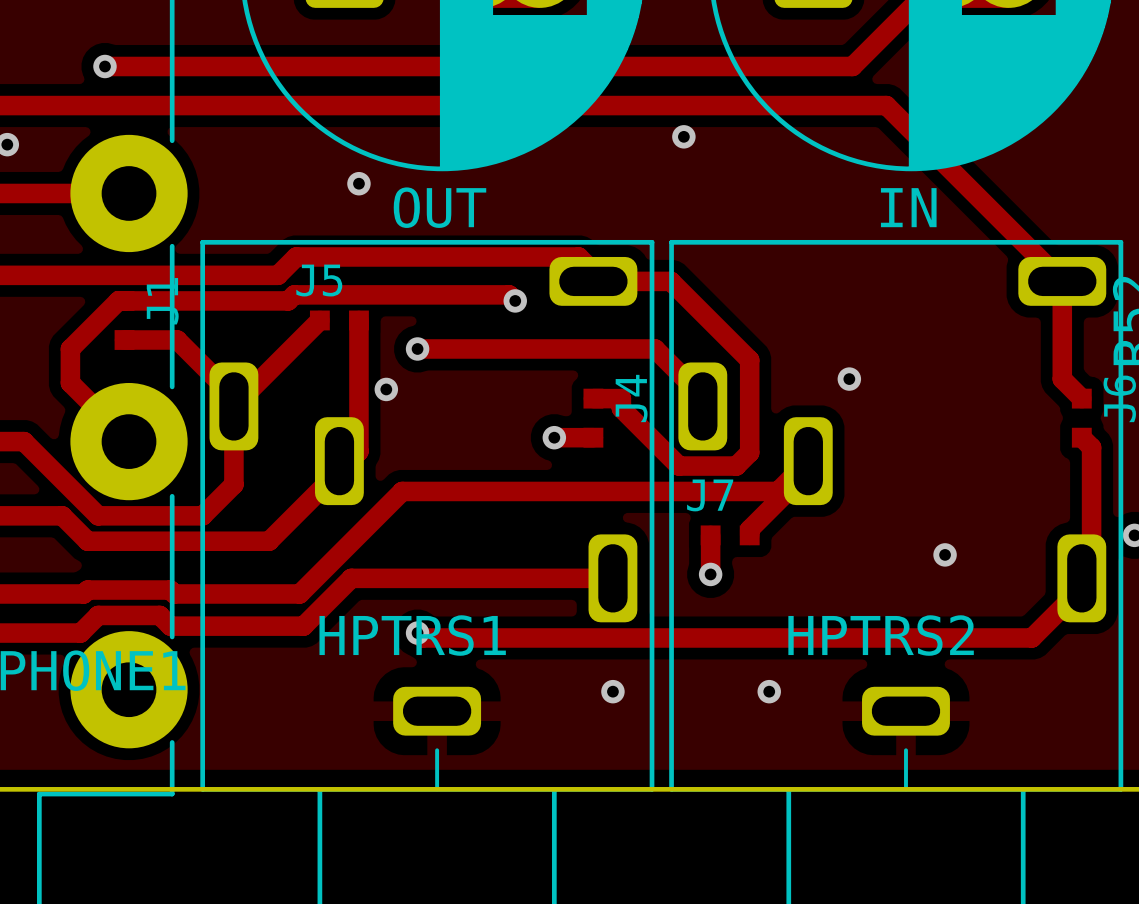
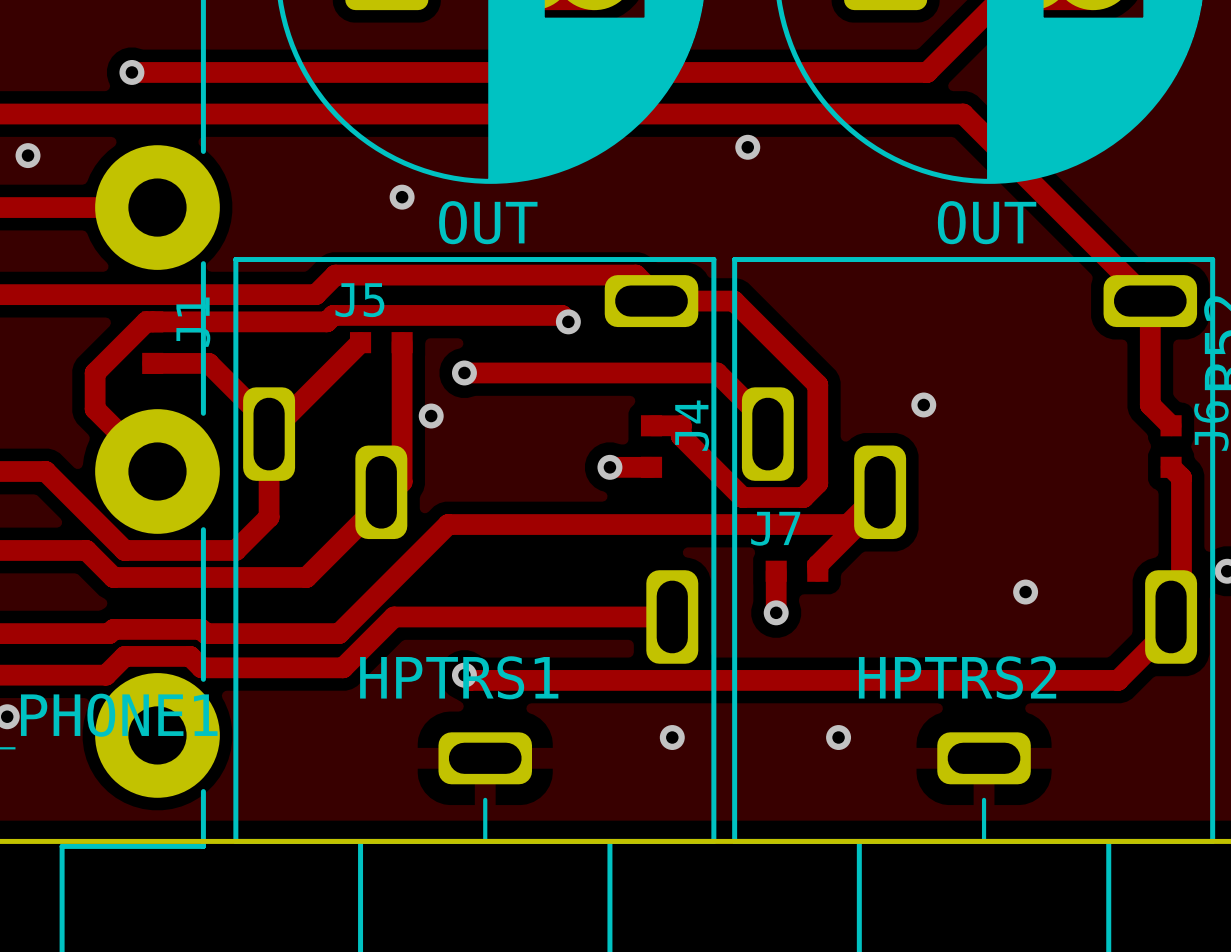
HPTRS2 text: IN (908, 207) -> OUT (987, 222)

